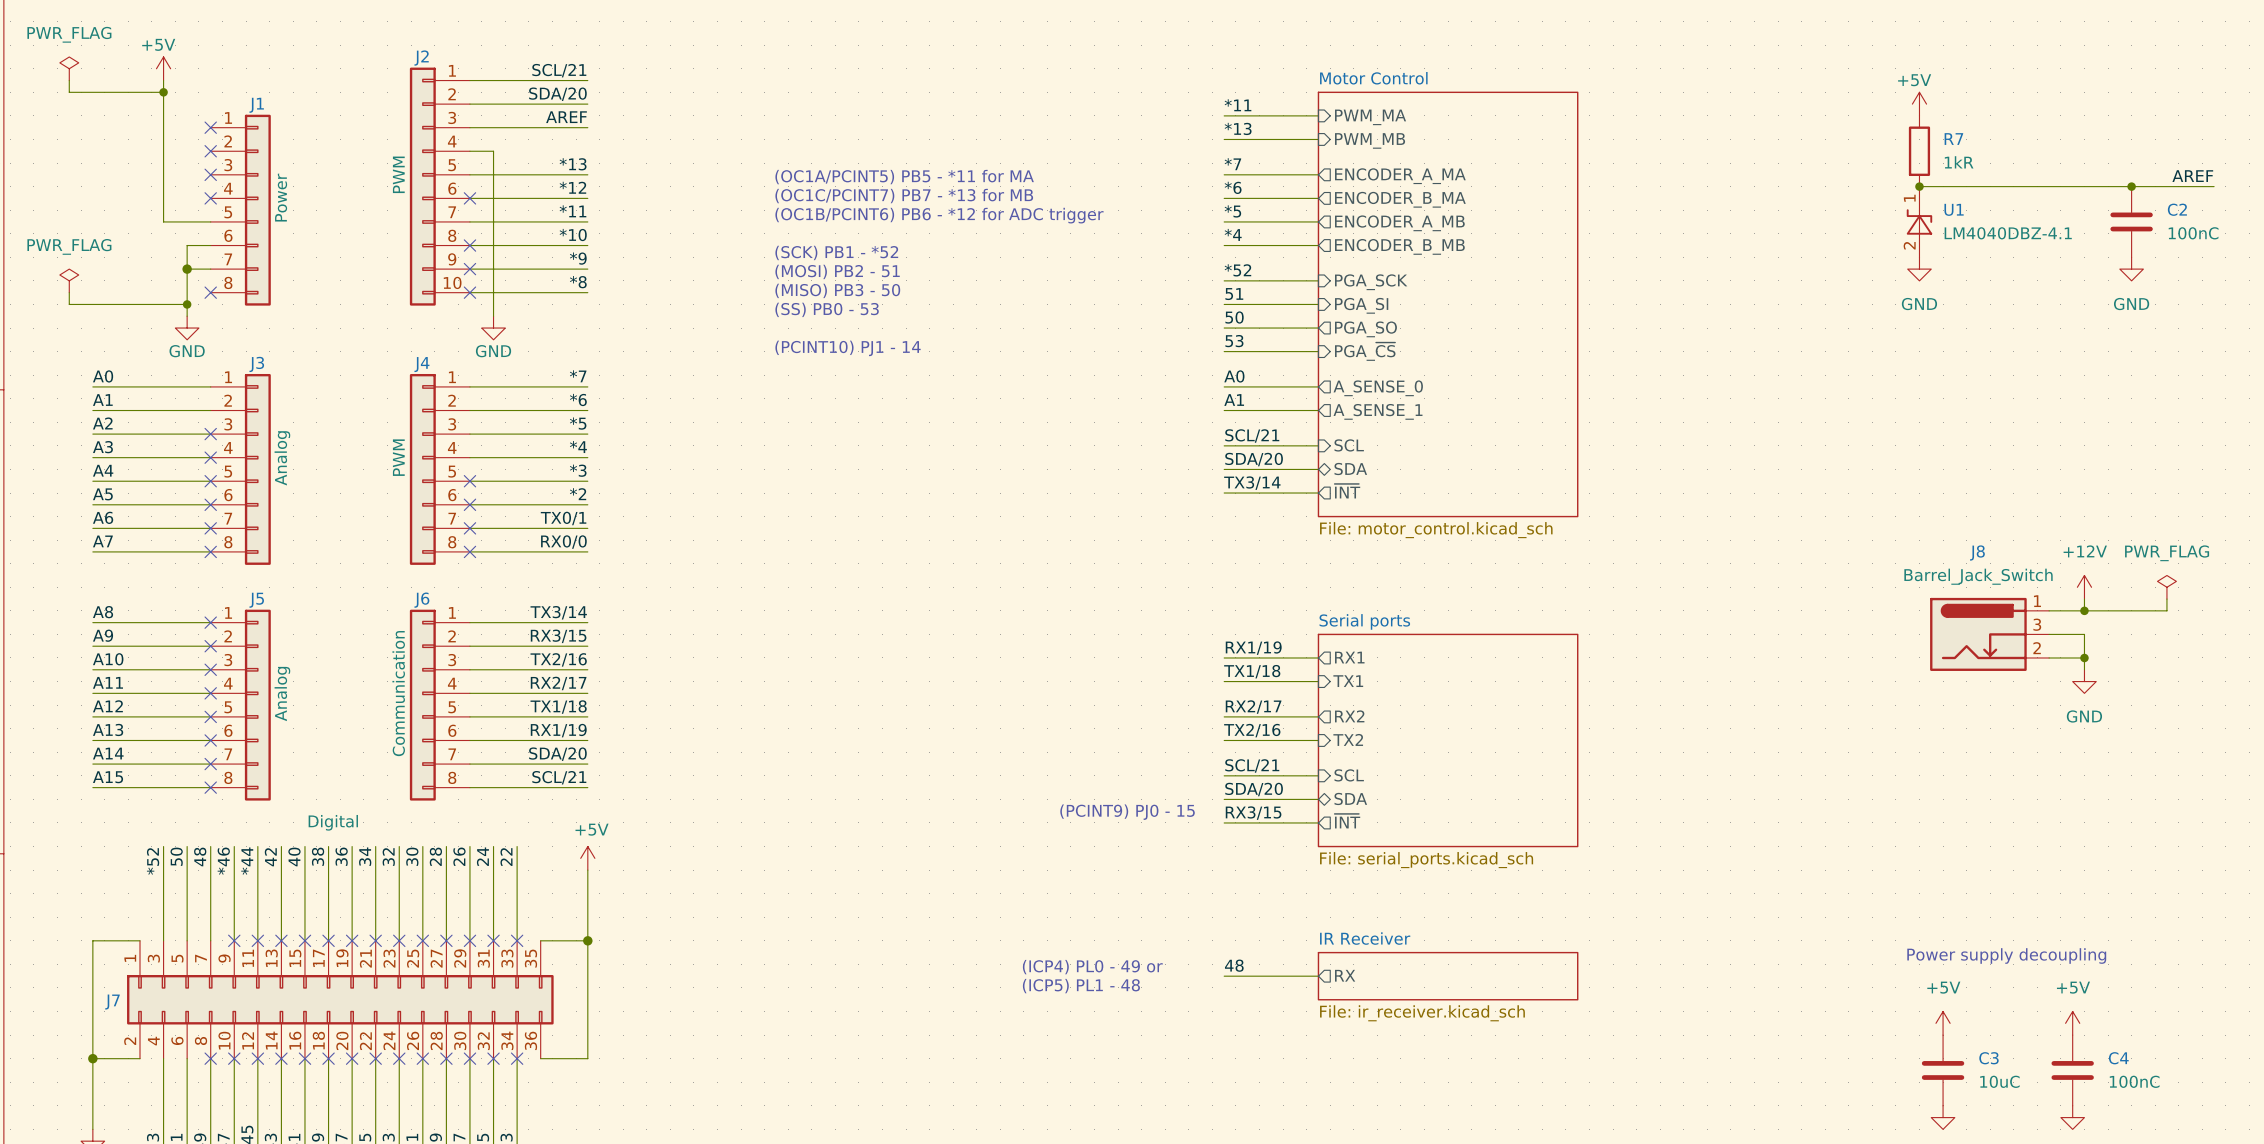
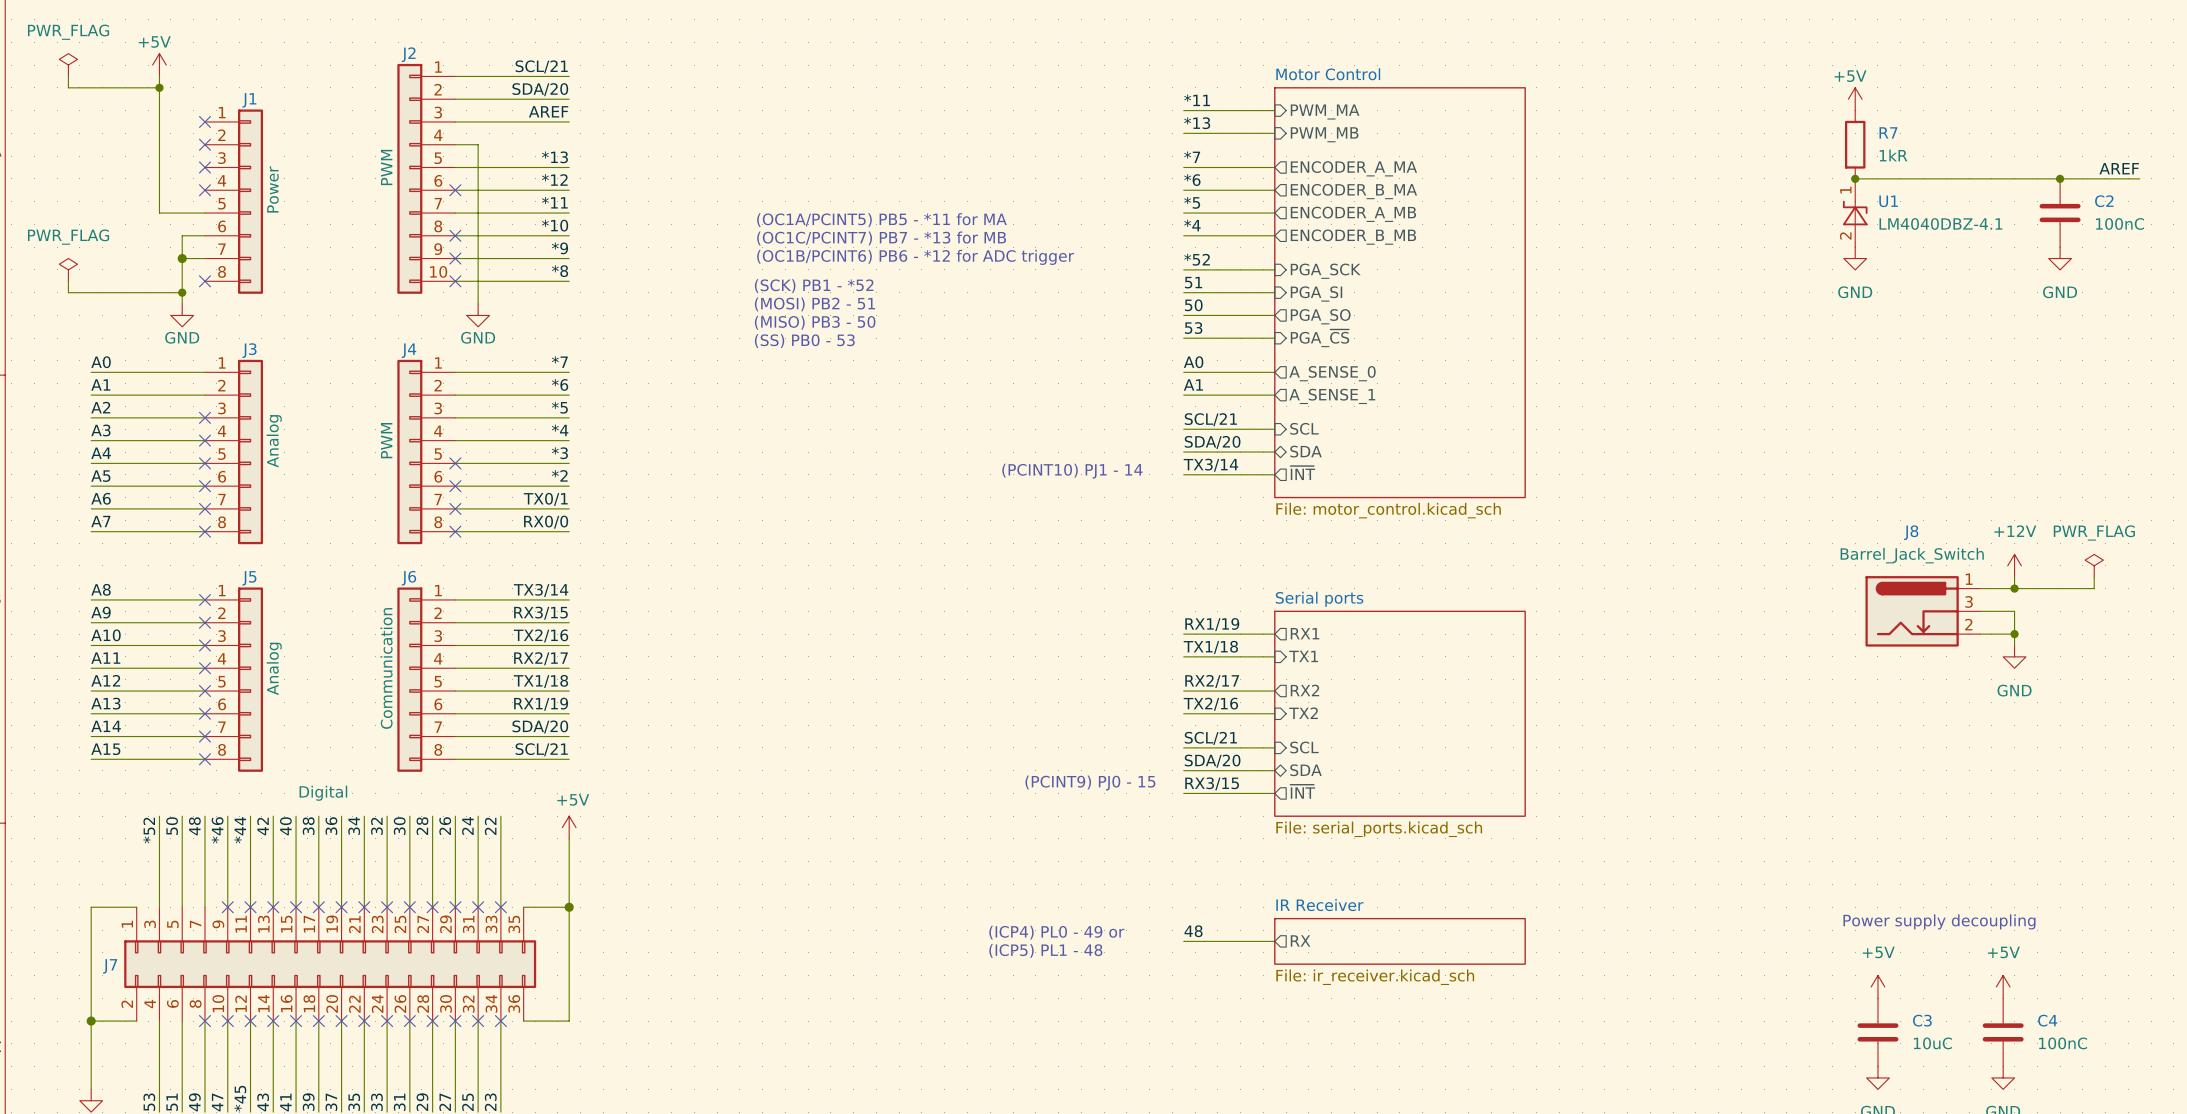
text position: (OC1A/PCINT5) PB5 - *11 for MA (904, 177) -> (OC1A/PCINT5) PB5 - *11 for MA (881, 220)
text position: (OC1C/PCINT7) PB7 - *13 for MB (904, 196) -> (OC1C/PCINT7) PB7 - *13 for MB (881, 238)
text position: (OC1B/PCINT6) PB6 - *12 for ADC trigger (939, 215) -> (OC1B/PCINT6) PB6 - *12 for ADC trigger (915, 257)
text position: (SCK) PB1 - *52 (836, 252) -> (SCK) PB1 - *52 (814, 286)
text position: (MOSI) PB2 - 51 (837, 271) -> (MOSI) PB2 - 51 (814, 304)
text position: (MISO) PB3 - 50 (837, 290) -> (MISO) PB3 - 50 (815, 322)
text position: (SS) PB0 - 53 (827, 309) -> (SS) PB0 - 53 (804, 341)
text: (PCINT10) PJ1 - 14 (848, 348) -> none
text: none -> (PCINT10) PJ1 - 14 (1072, 471)

